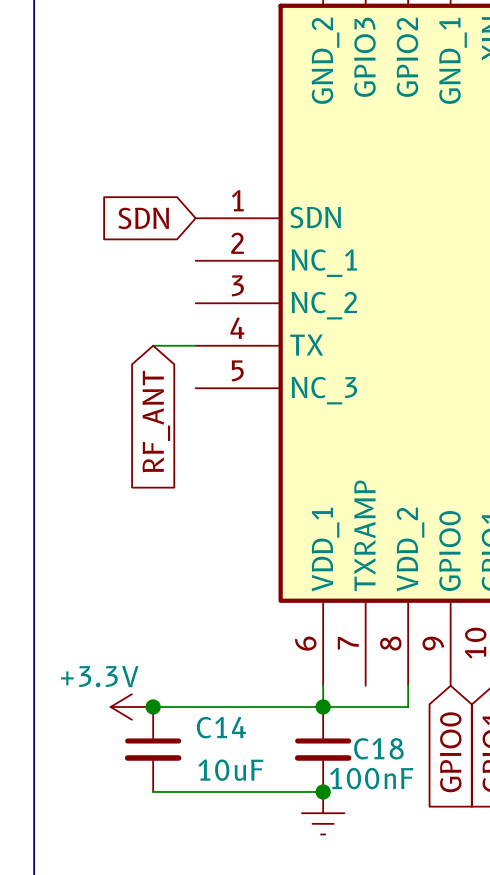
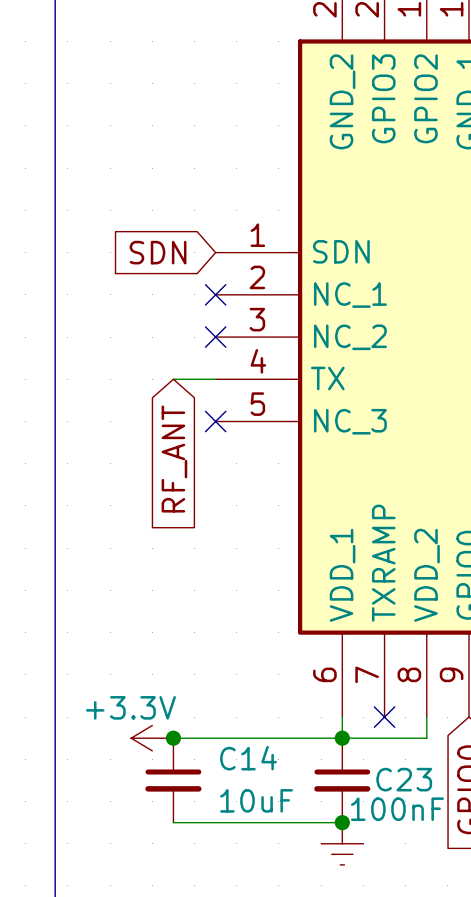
no-connect mark: none -> (215, 294)
no-connect mark: none -> (215, 337)
no-connect mark: none -> (215, 421)
no-connect mark: none -> (384, 717)
C18 name: C18 (378, 748) -> C23 (404, 779)

